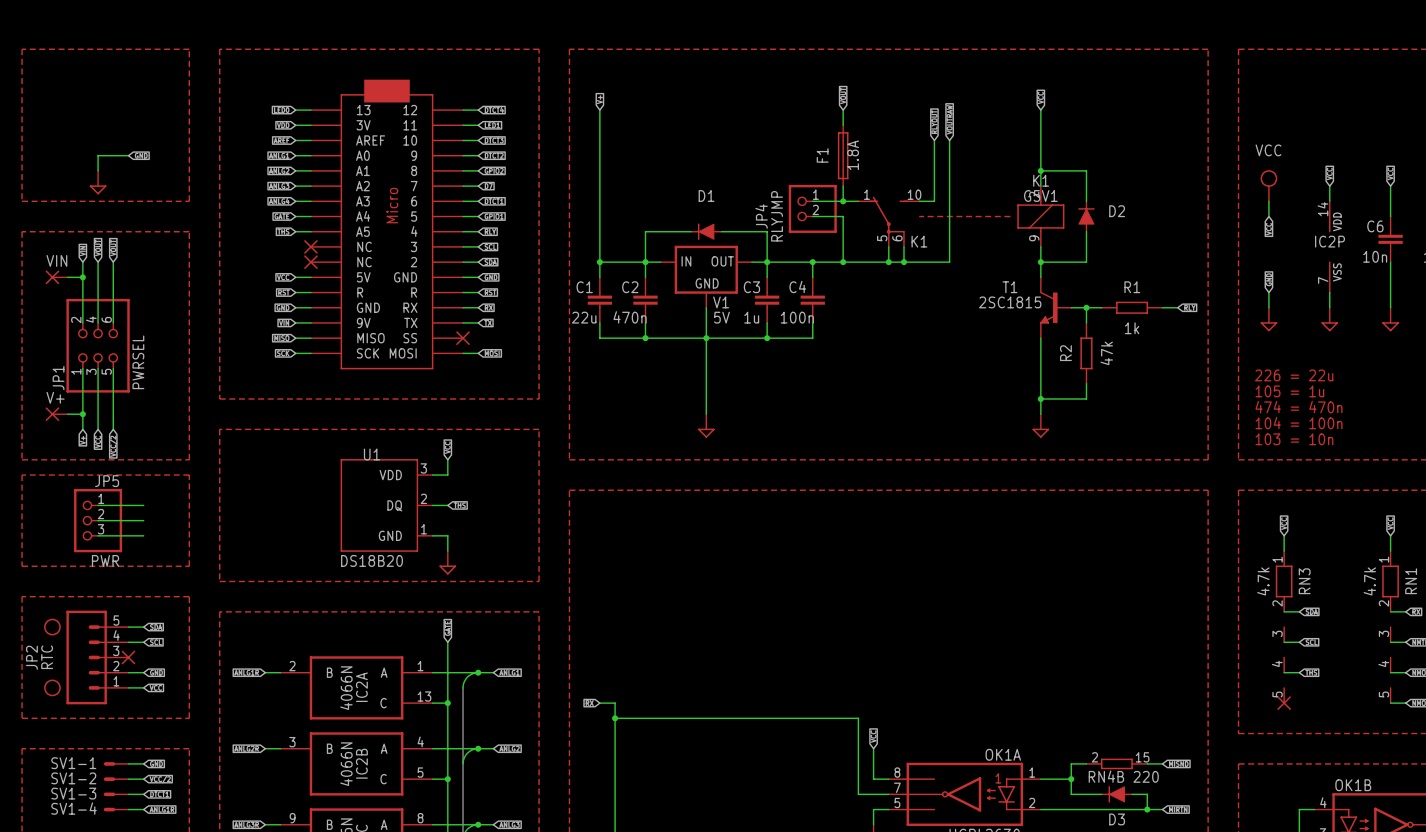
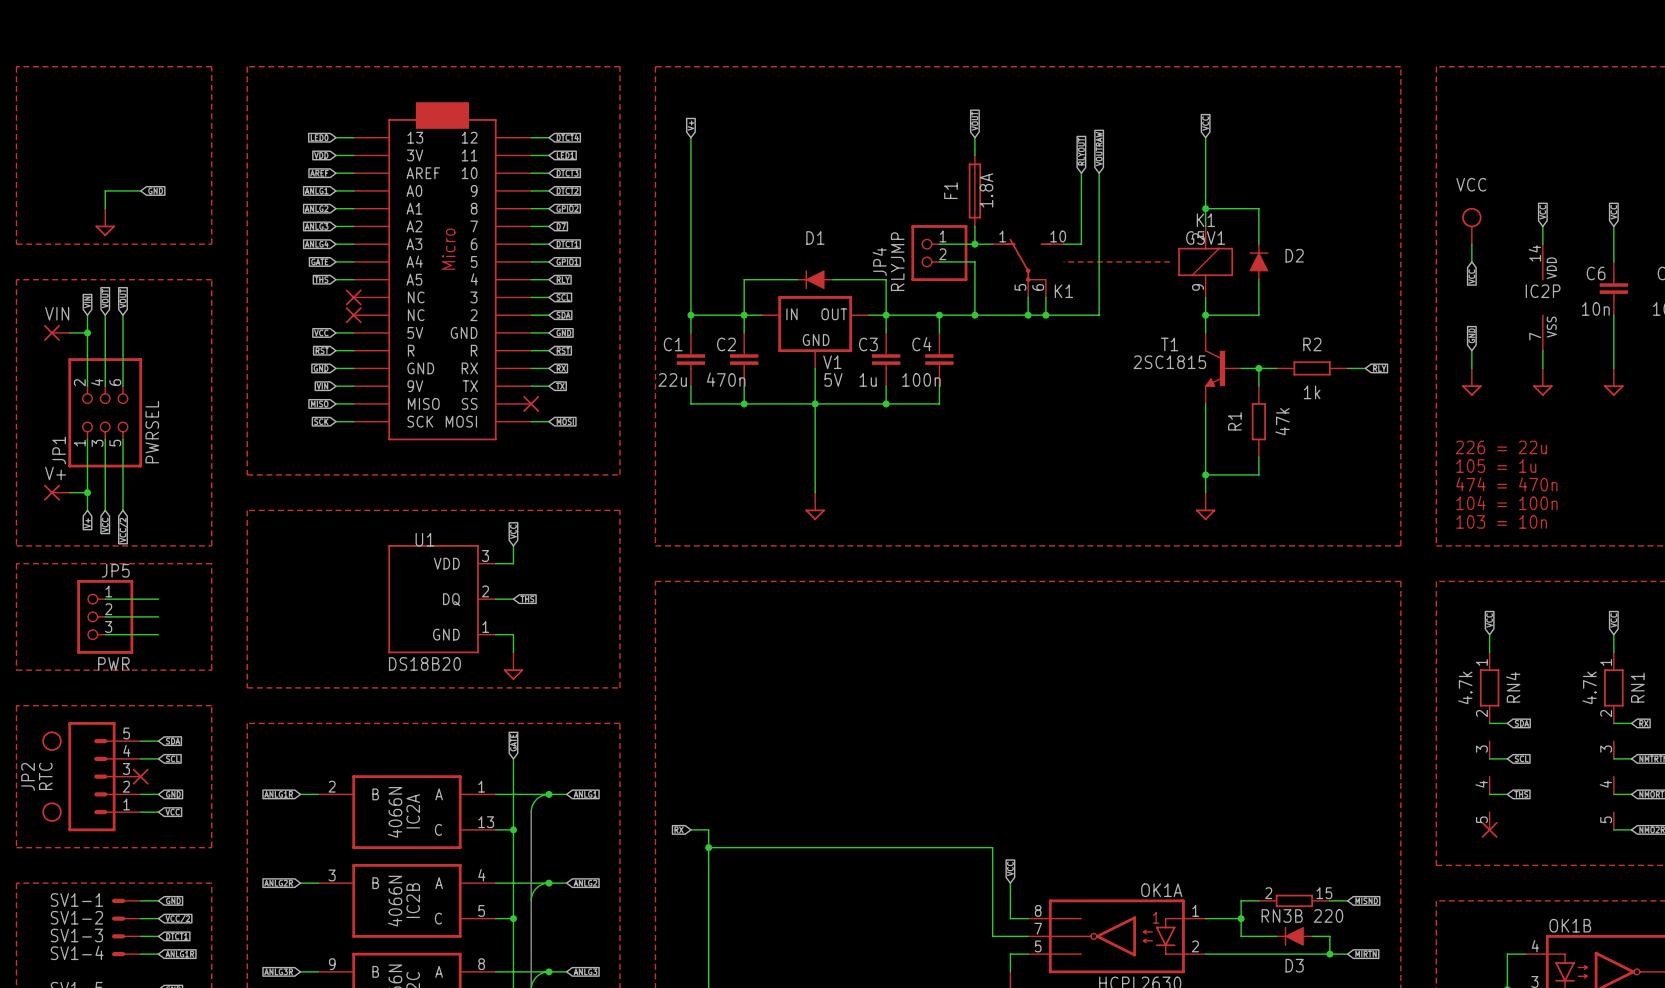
R1 name: R1 (1132, 287) -> R2 (1312, 344)
R2 name: R2 (1065, 353) -> R1 (1234, 421)
RN3 name: RN3 (1304, 581) -> RN4 (1513, 687)
RN4B name: RN4B (1106, 776) -> RN3B (1282, 915)

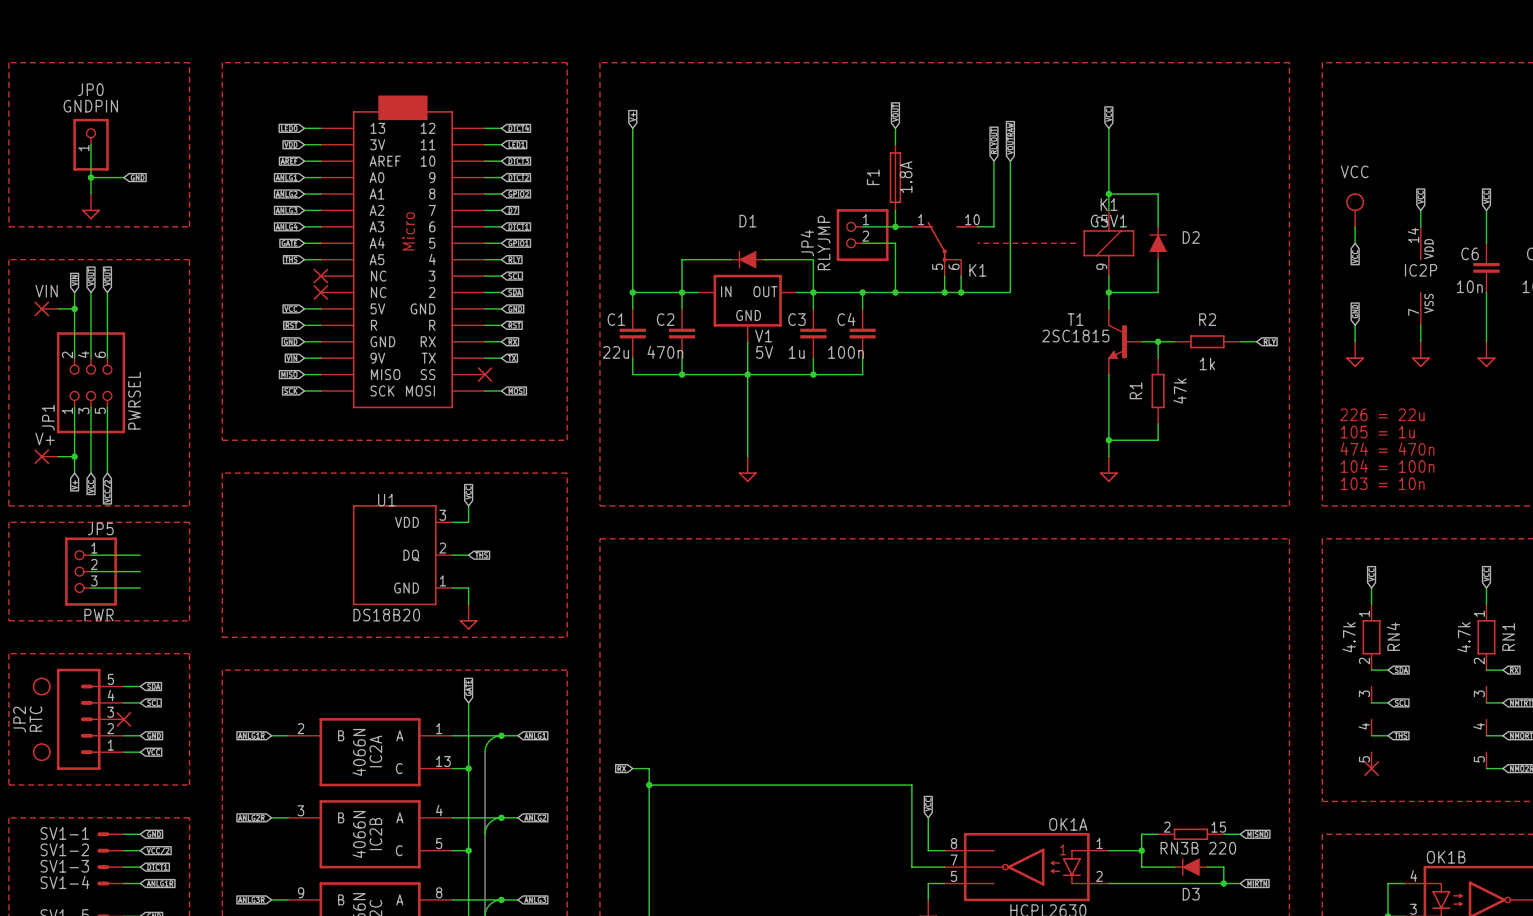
wire: none -> (91, 144) (91, 177)
JP0: none -> GNDPIN (91, 144)
junction: none -> (91, 177)

